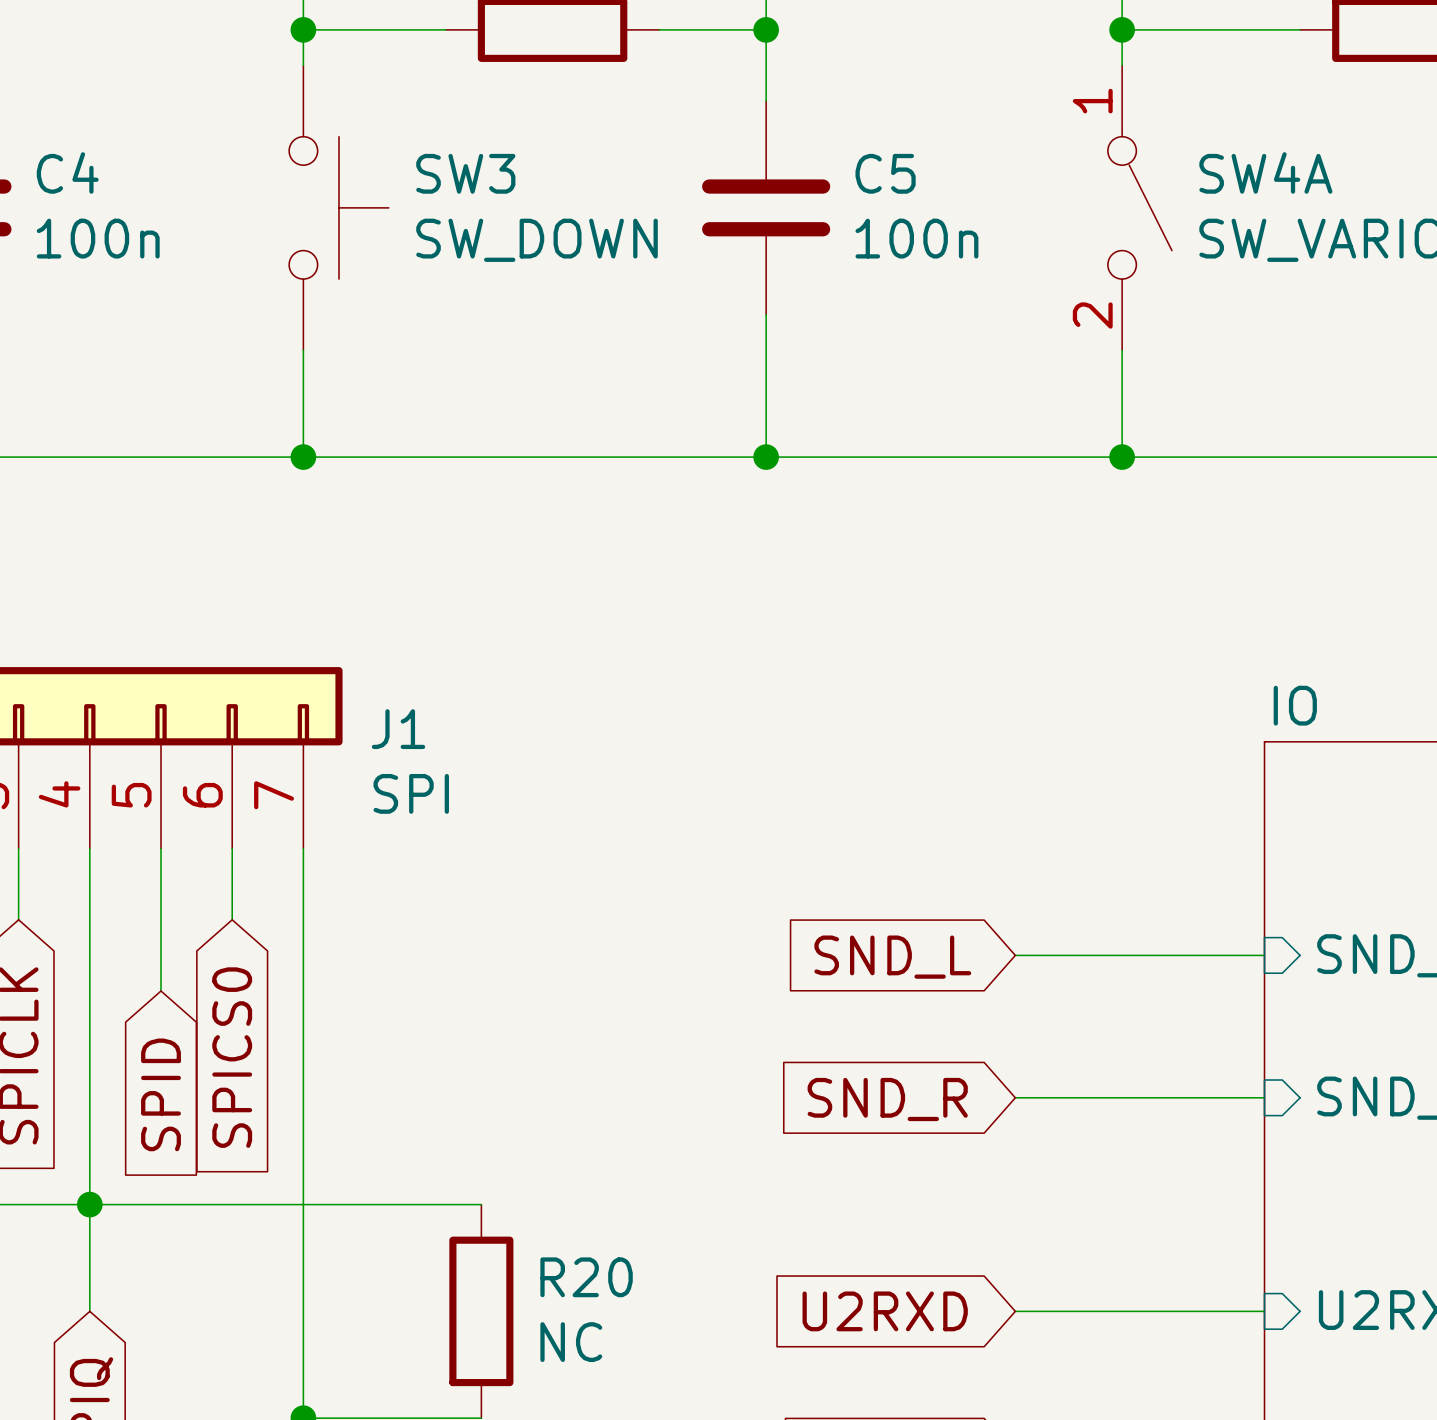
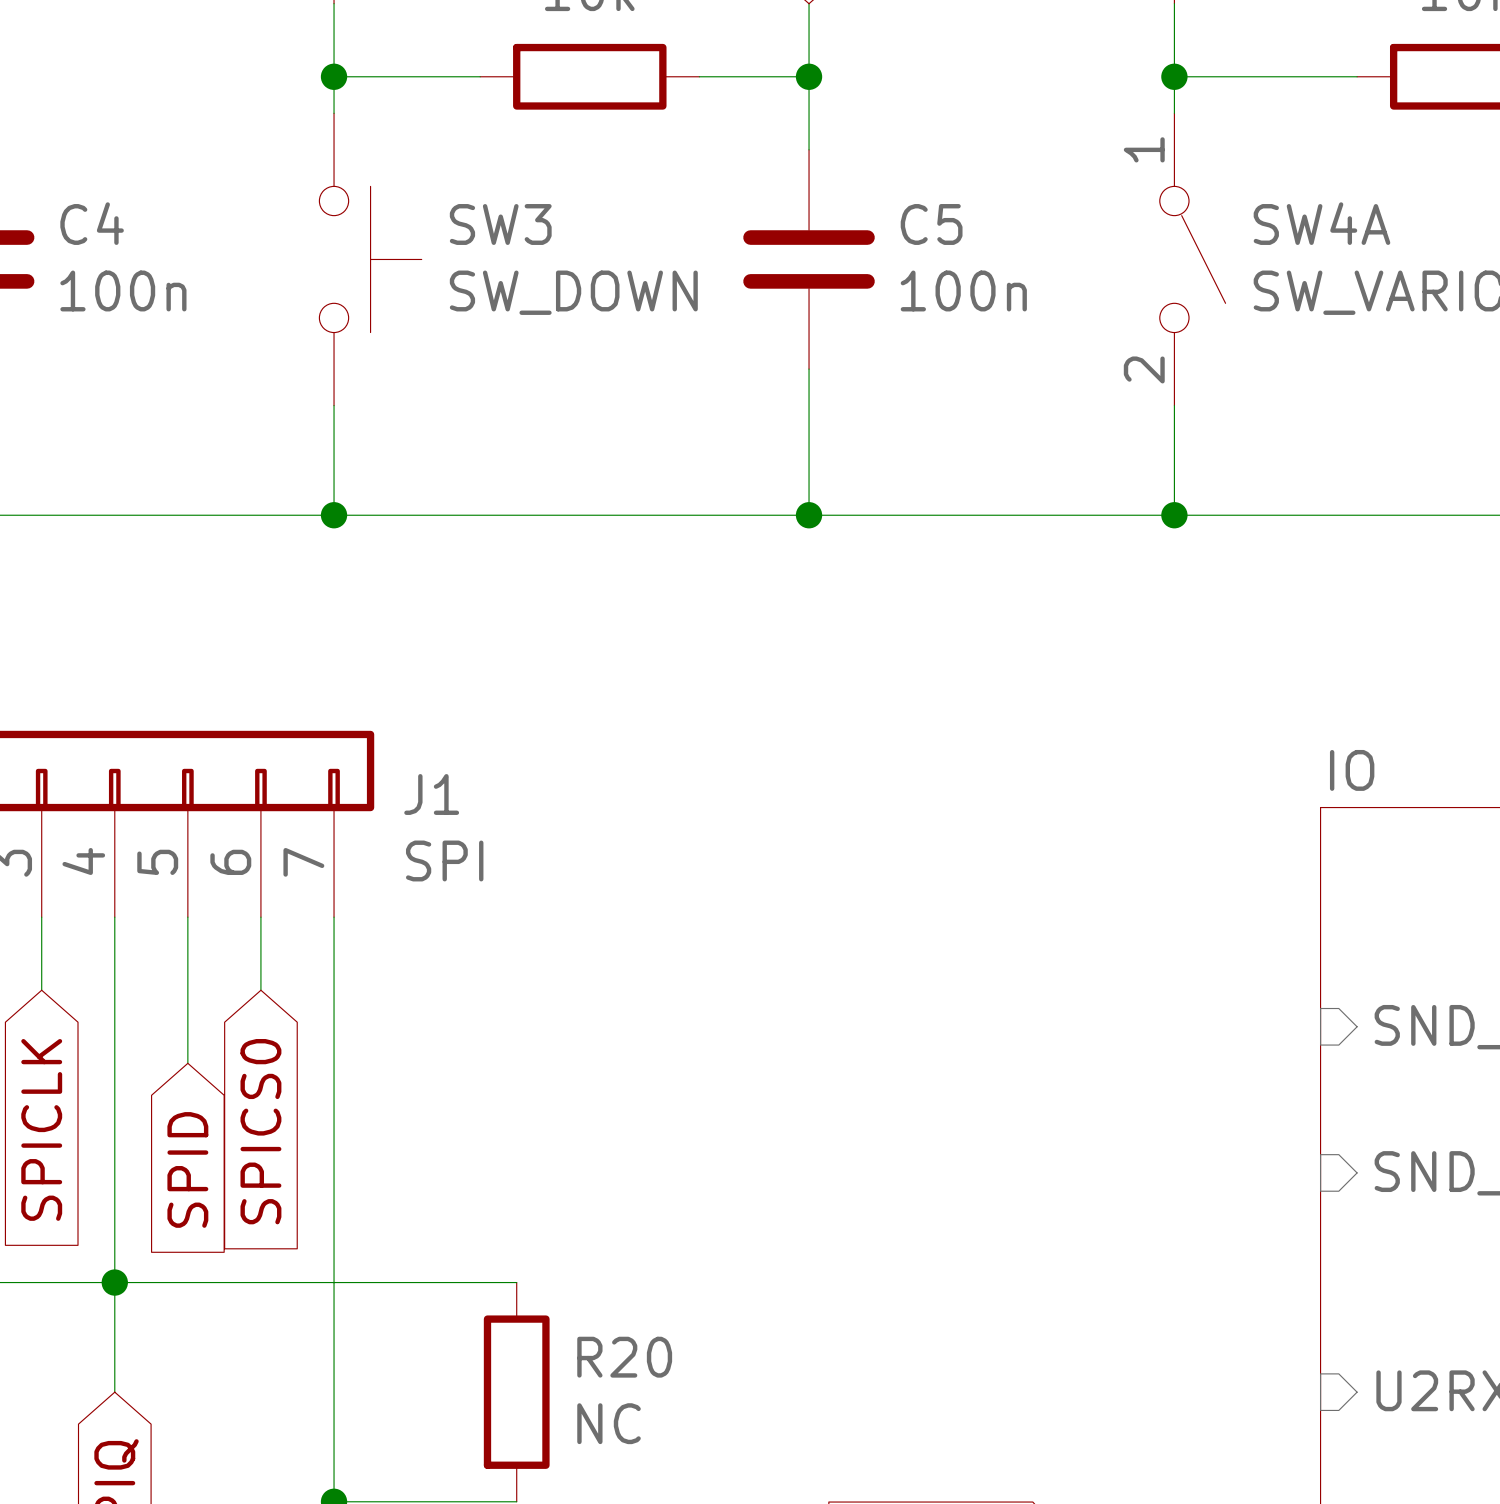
wire: (1015, 955) (1264, 955) -> none
global label: SND_L (892, 957) -> none
wire: (1015, 1097) (1264, 1097) -> none
global label: SND_R (887, 1099) -> none
global label: U2RXD (885, 1311) -> none
wire: (1015, 1311) (1264, 1311) -> none

